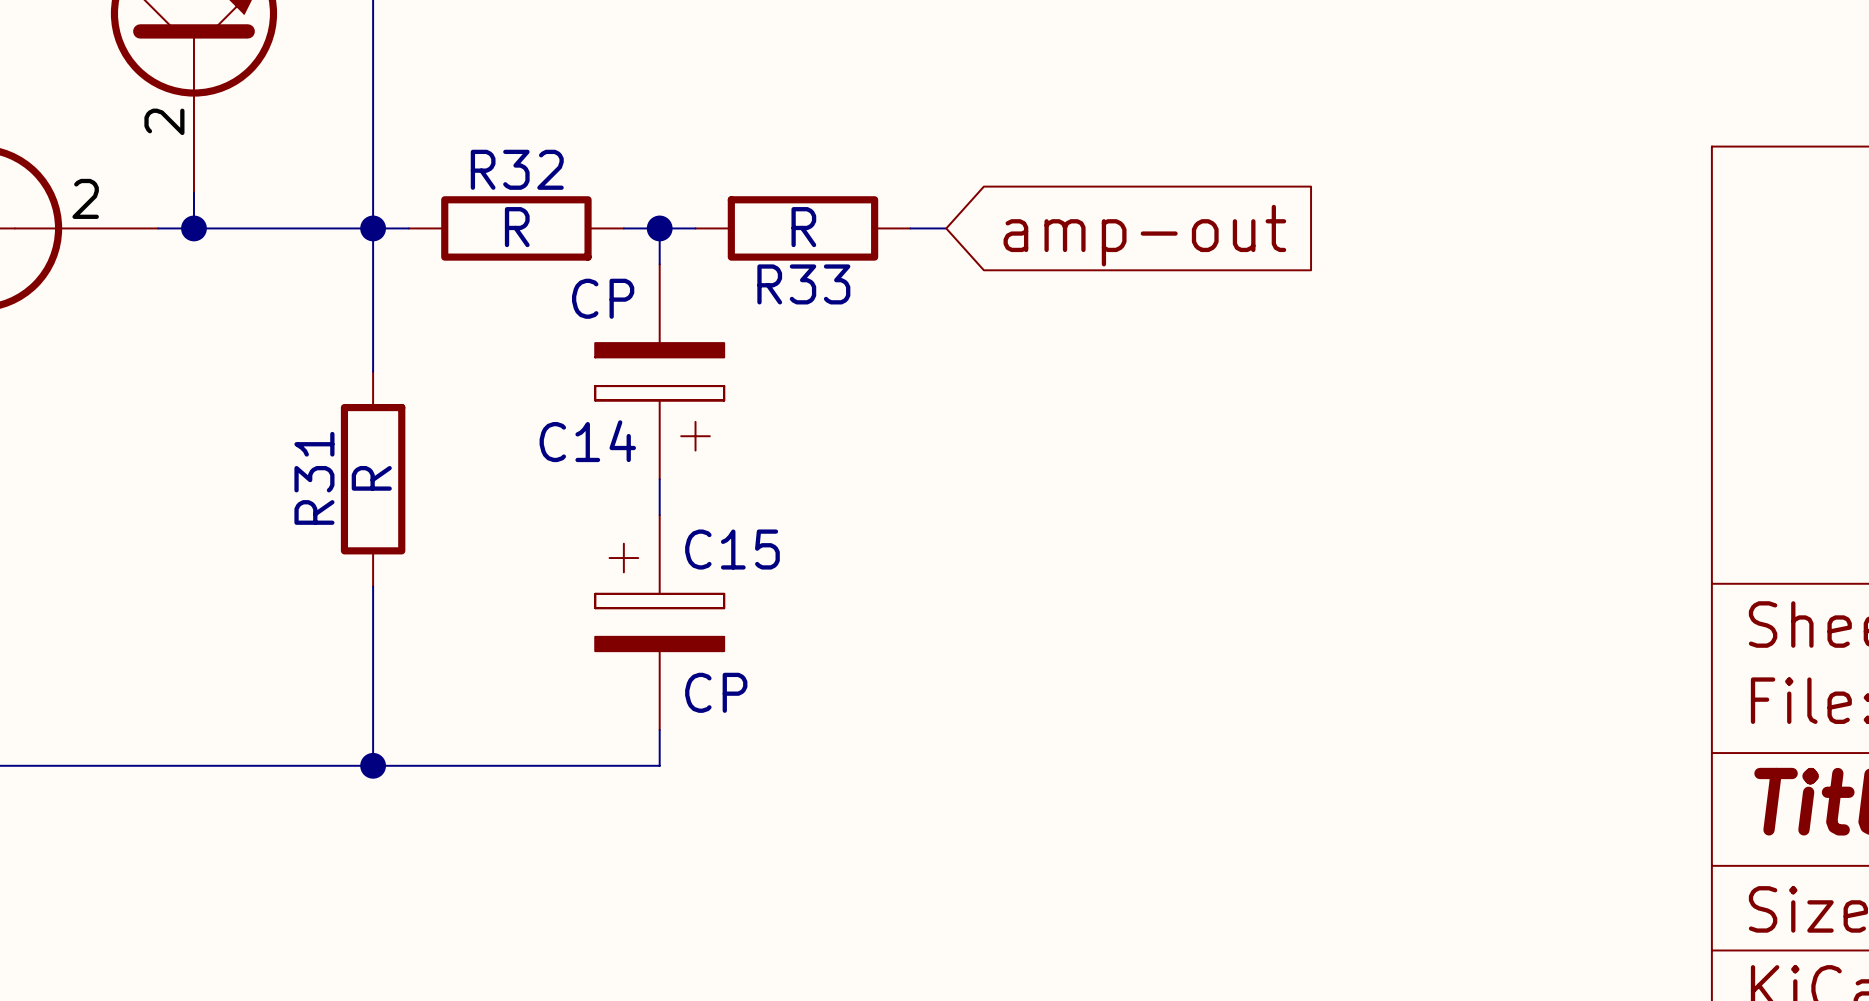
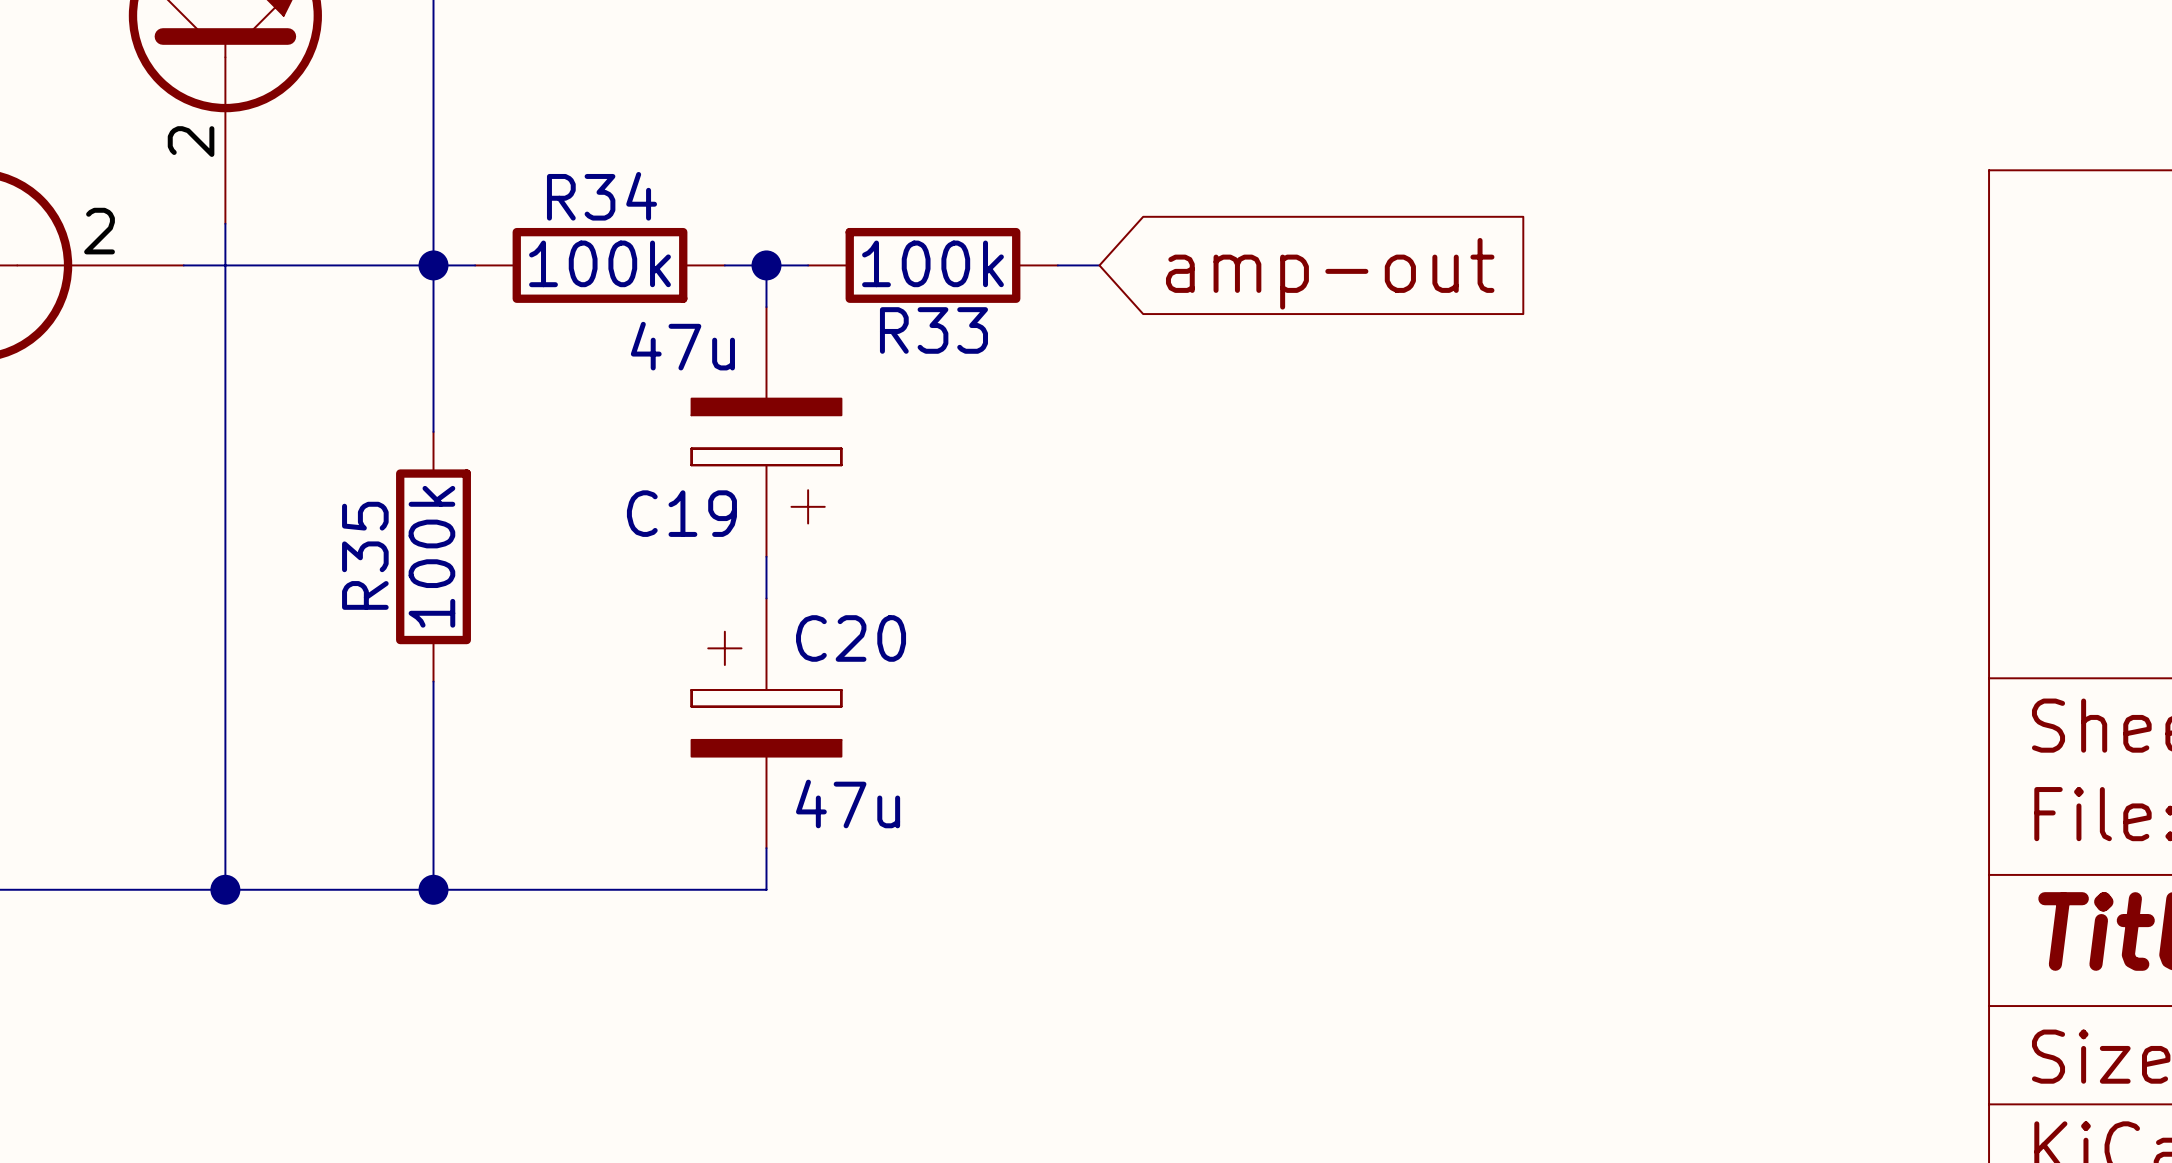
R32 name: R32 (517, 169) -> R34 (601, 196)
R32 value: R (517, 227) -> 100k (600, 263)
R33 value: R (803, 227) -> 100k (932, 263)
wire: none -> (225, 265) (225, 889)
junction: (193, 228) -> none
C14 value: CP (603, 298) -> 47u (682, 346)
C14 name: C14 (587, 441) -> C19 (681, 513)
R31 name: R31 (314, 478) -> R35 (365, 555)
R31 value: R (371, 478) -> 100k (431, 556)
C15 name: C15 (732, 549) -> C20 (851, 638)
C15 value: CP (716, 692) -> 47u (848, 803)
junction: none -> (225, 889)

